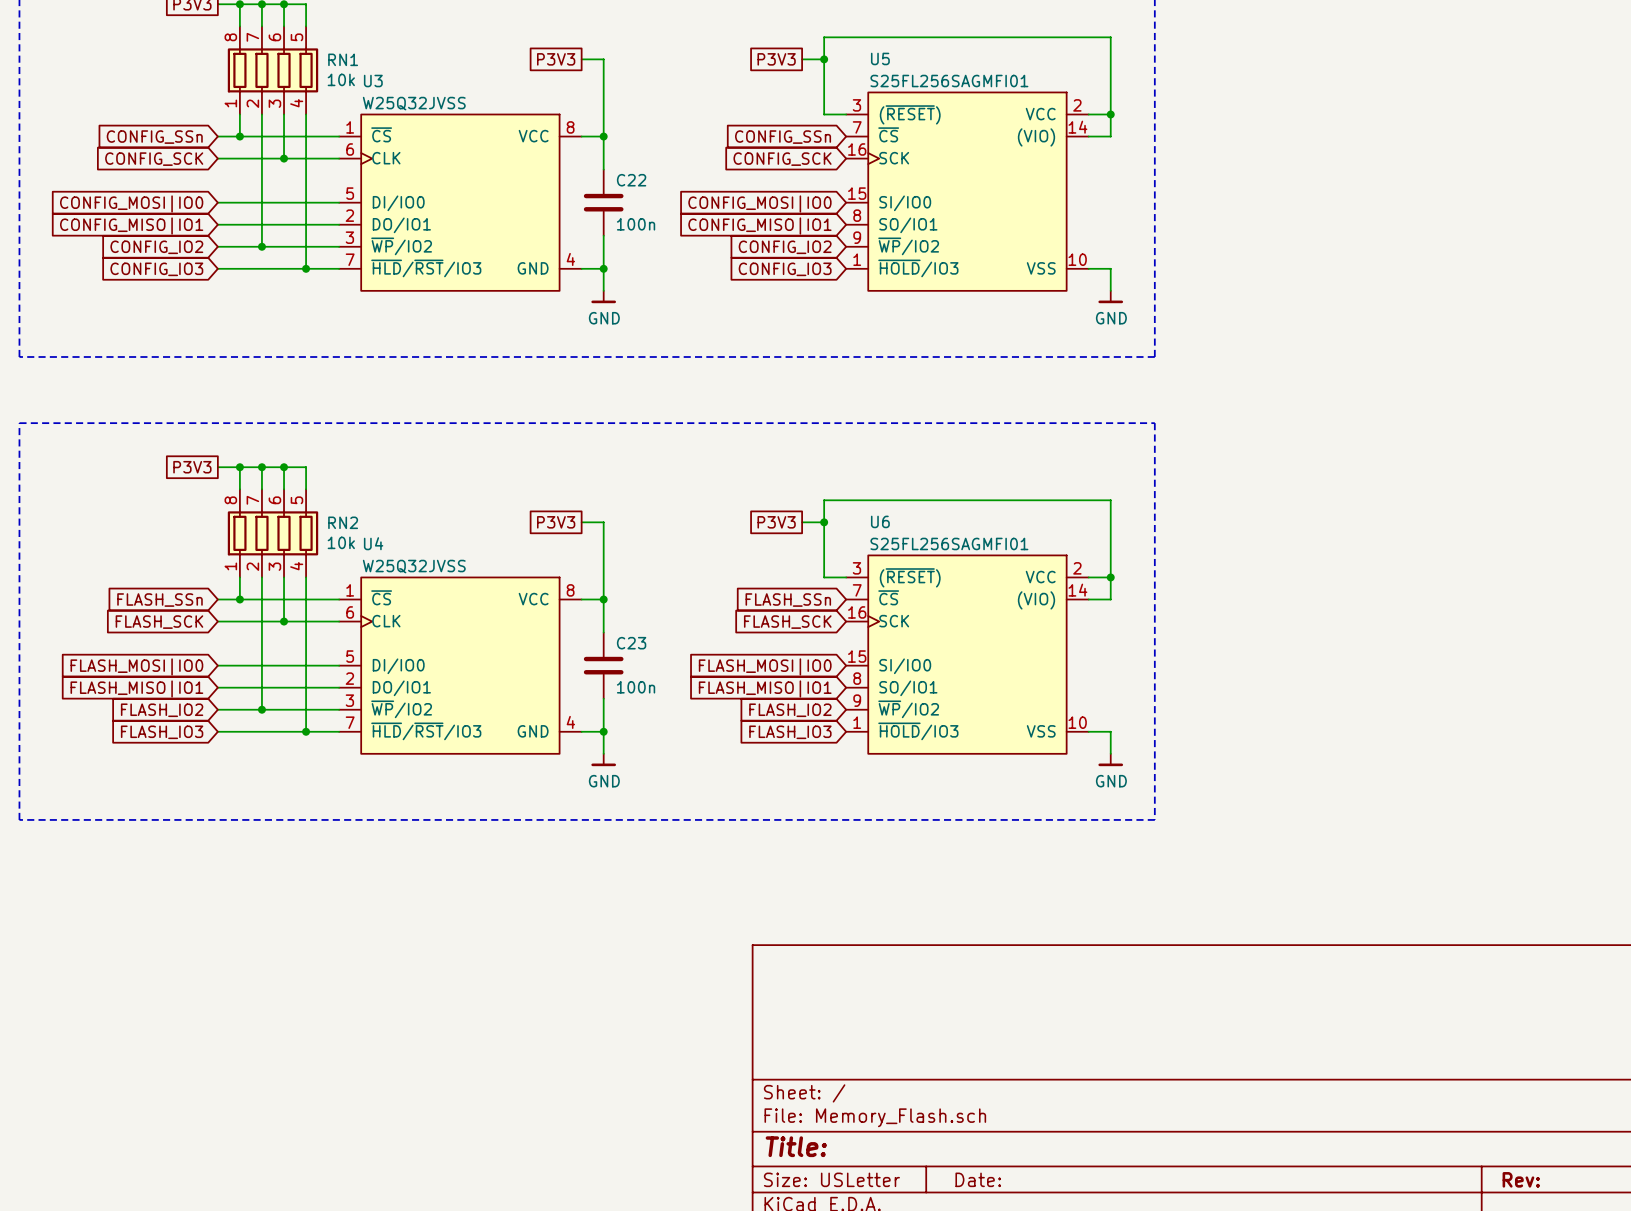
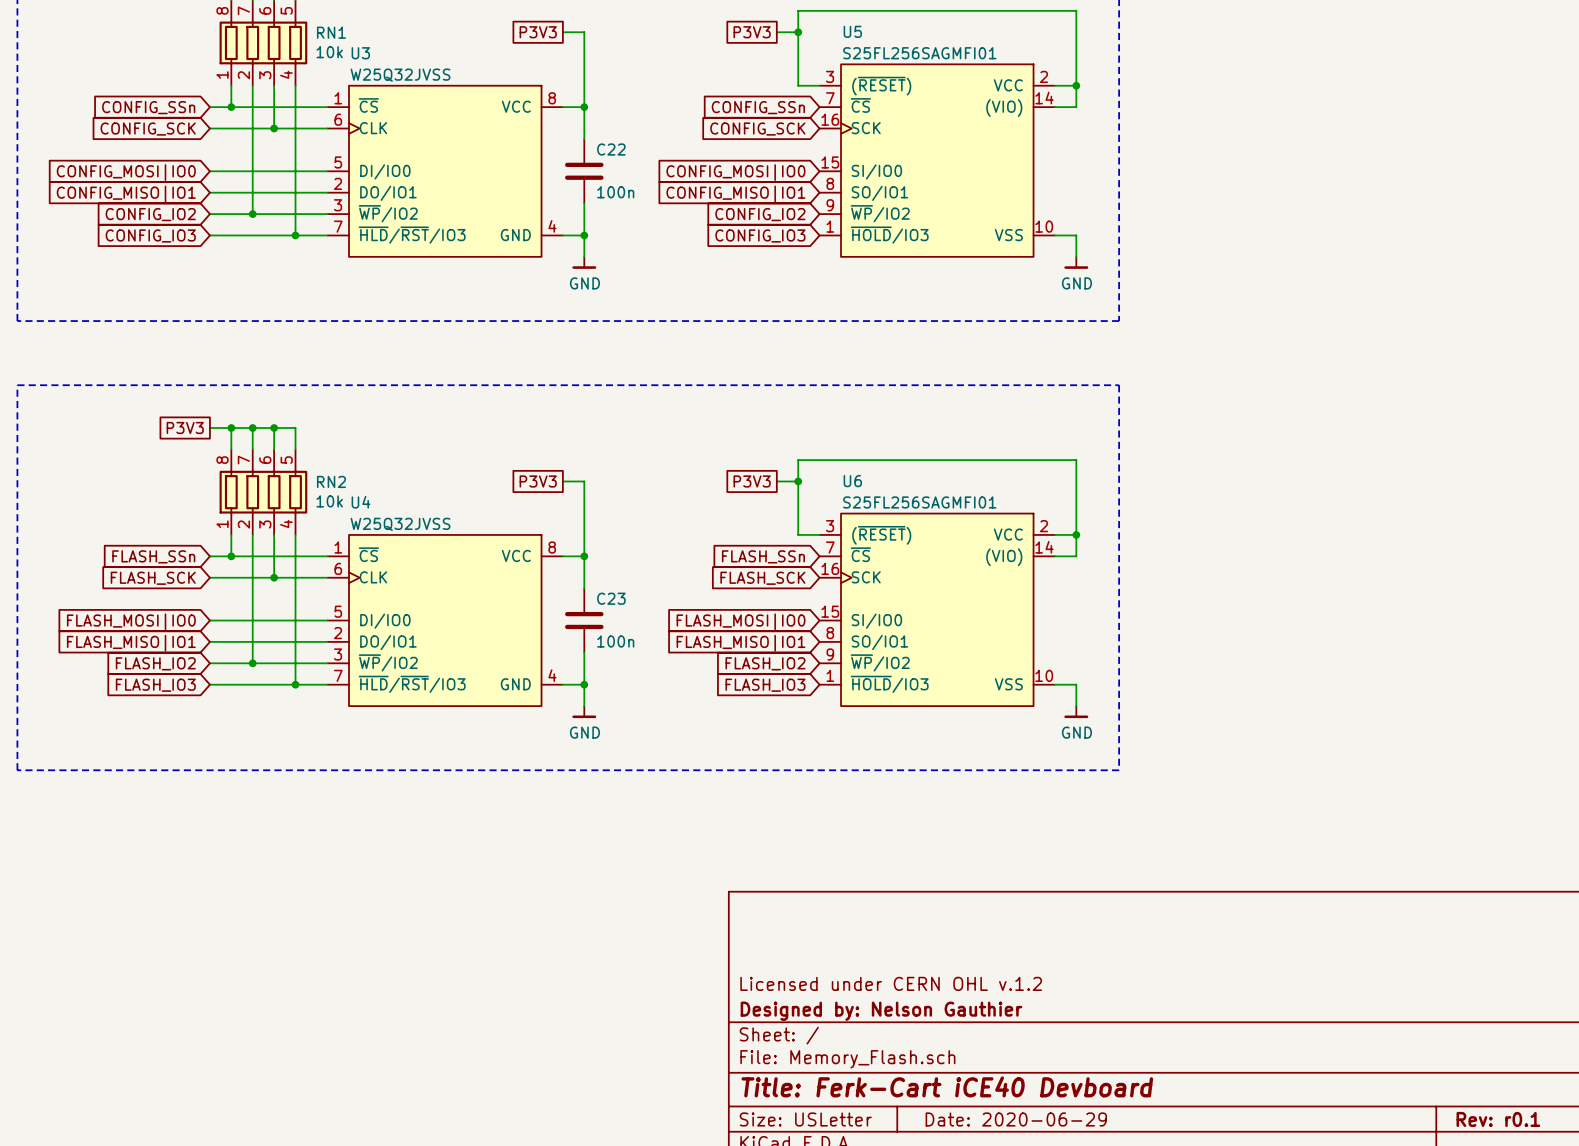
title block: none -> Licensed under CERN OHL v.1.2 (891, 983)
title block: none -> Designed by: Nelson Gauthier (881, 1011)
title block: Title: (796, 1146) -> Title: Ferk-Cart iCE40 Devboard (947, 1086)
title block: Date: (978, 1179) -> Date: 2020-06-29 (1016, 1119)
title block: Rev: (1521, 1179) -> Rev: r0.1 (1498, 1119)

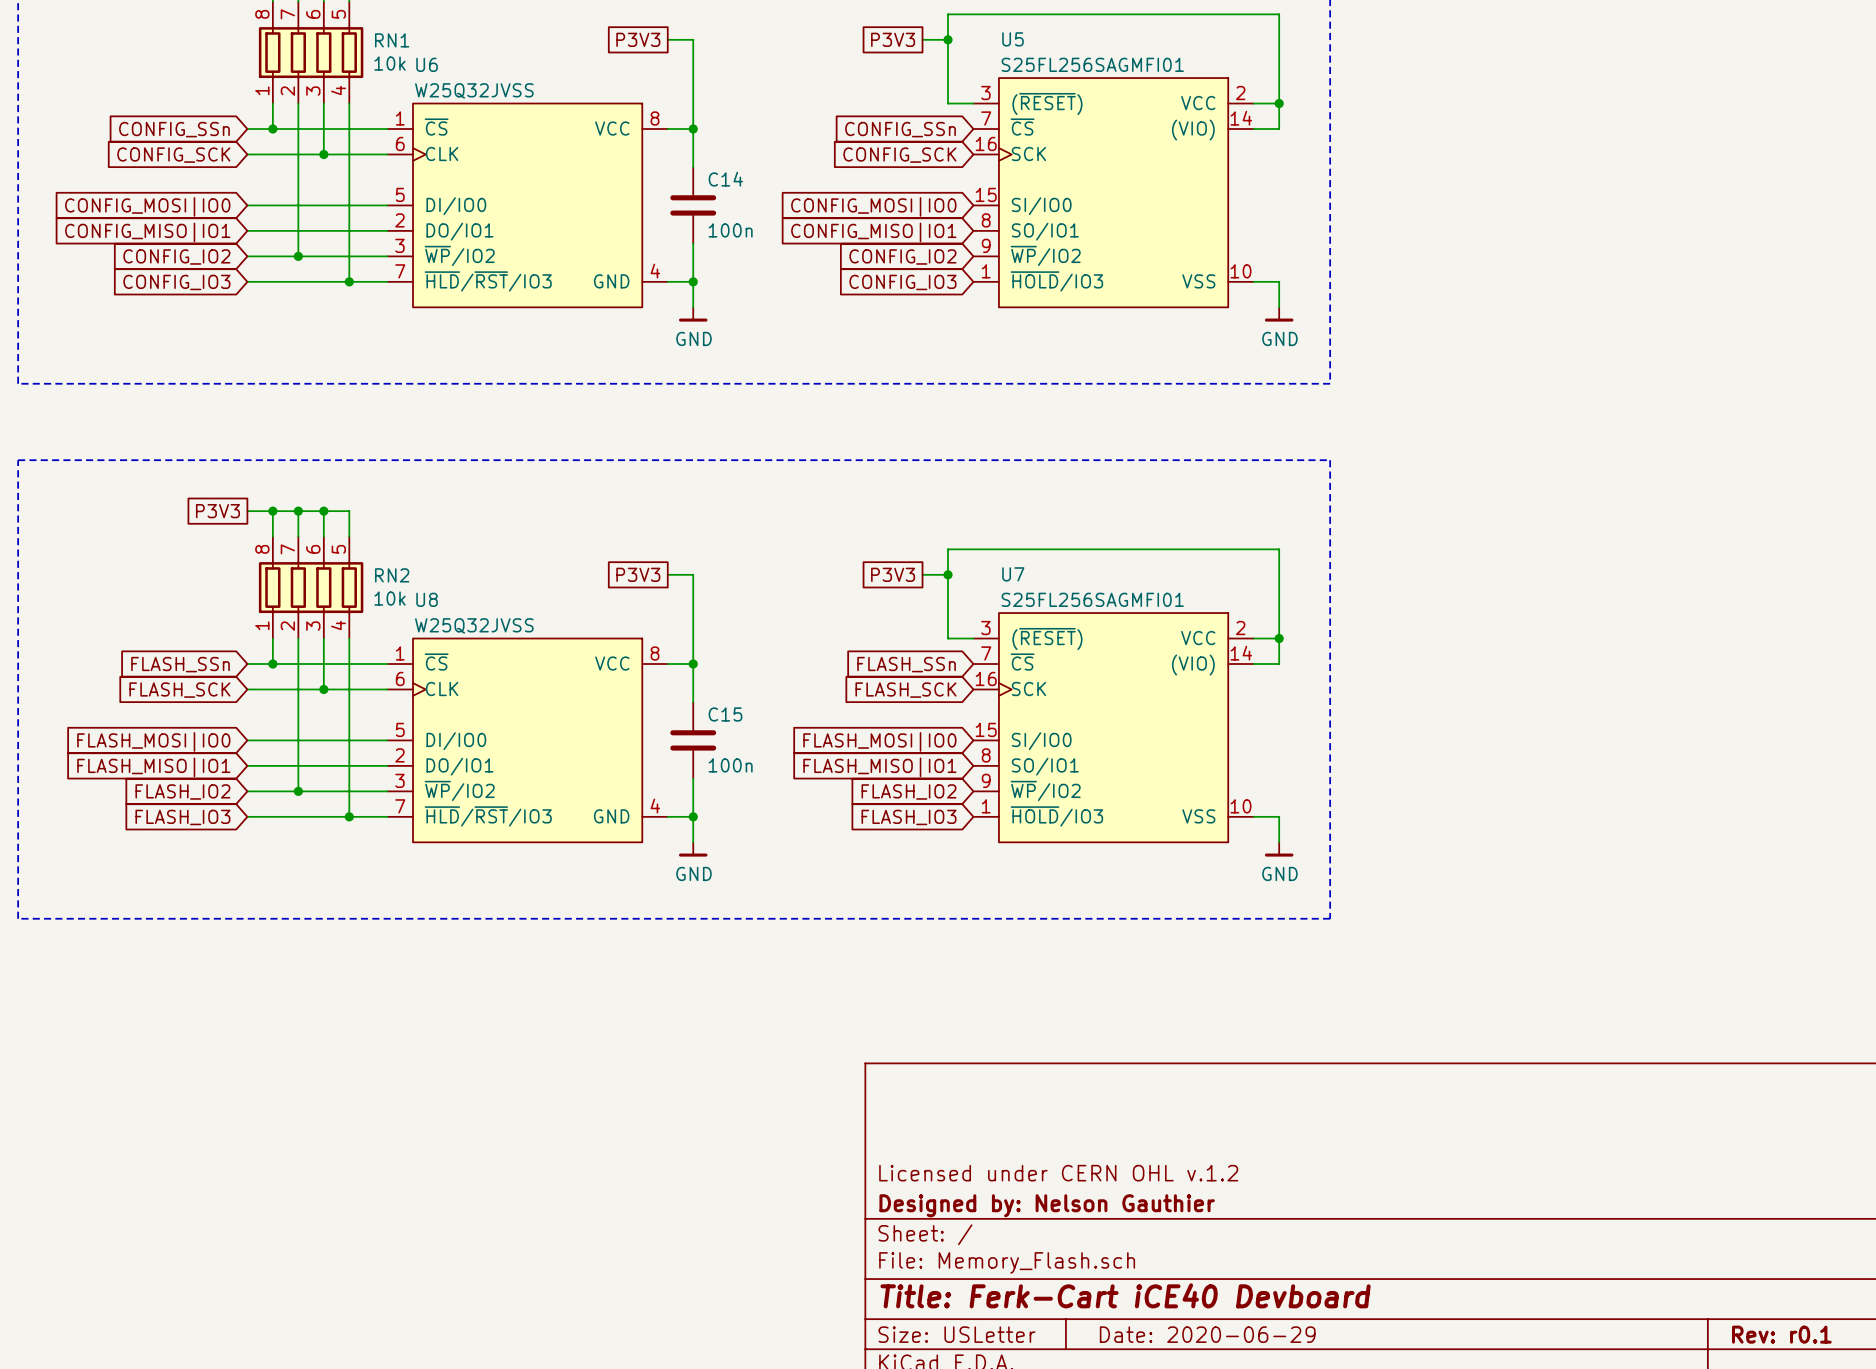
U3 name: U3 (360, 53) -> U6 (427, 64)
C22 name: C22 (611, 149) -> C14 (725, 179)
U6 name: U6 (852, 481) -> U7 (1013, 574)
U4 name: U4 (361, 502) -> U8 (427, 599)
C23 name: C23 (611, 598) -> C15 (725, 714)

